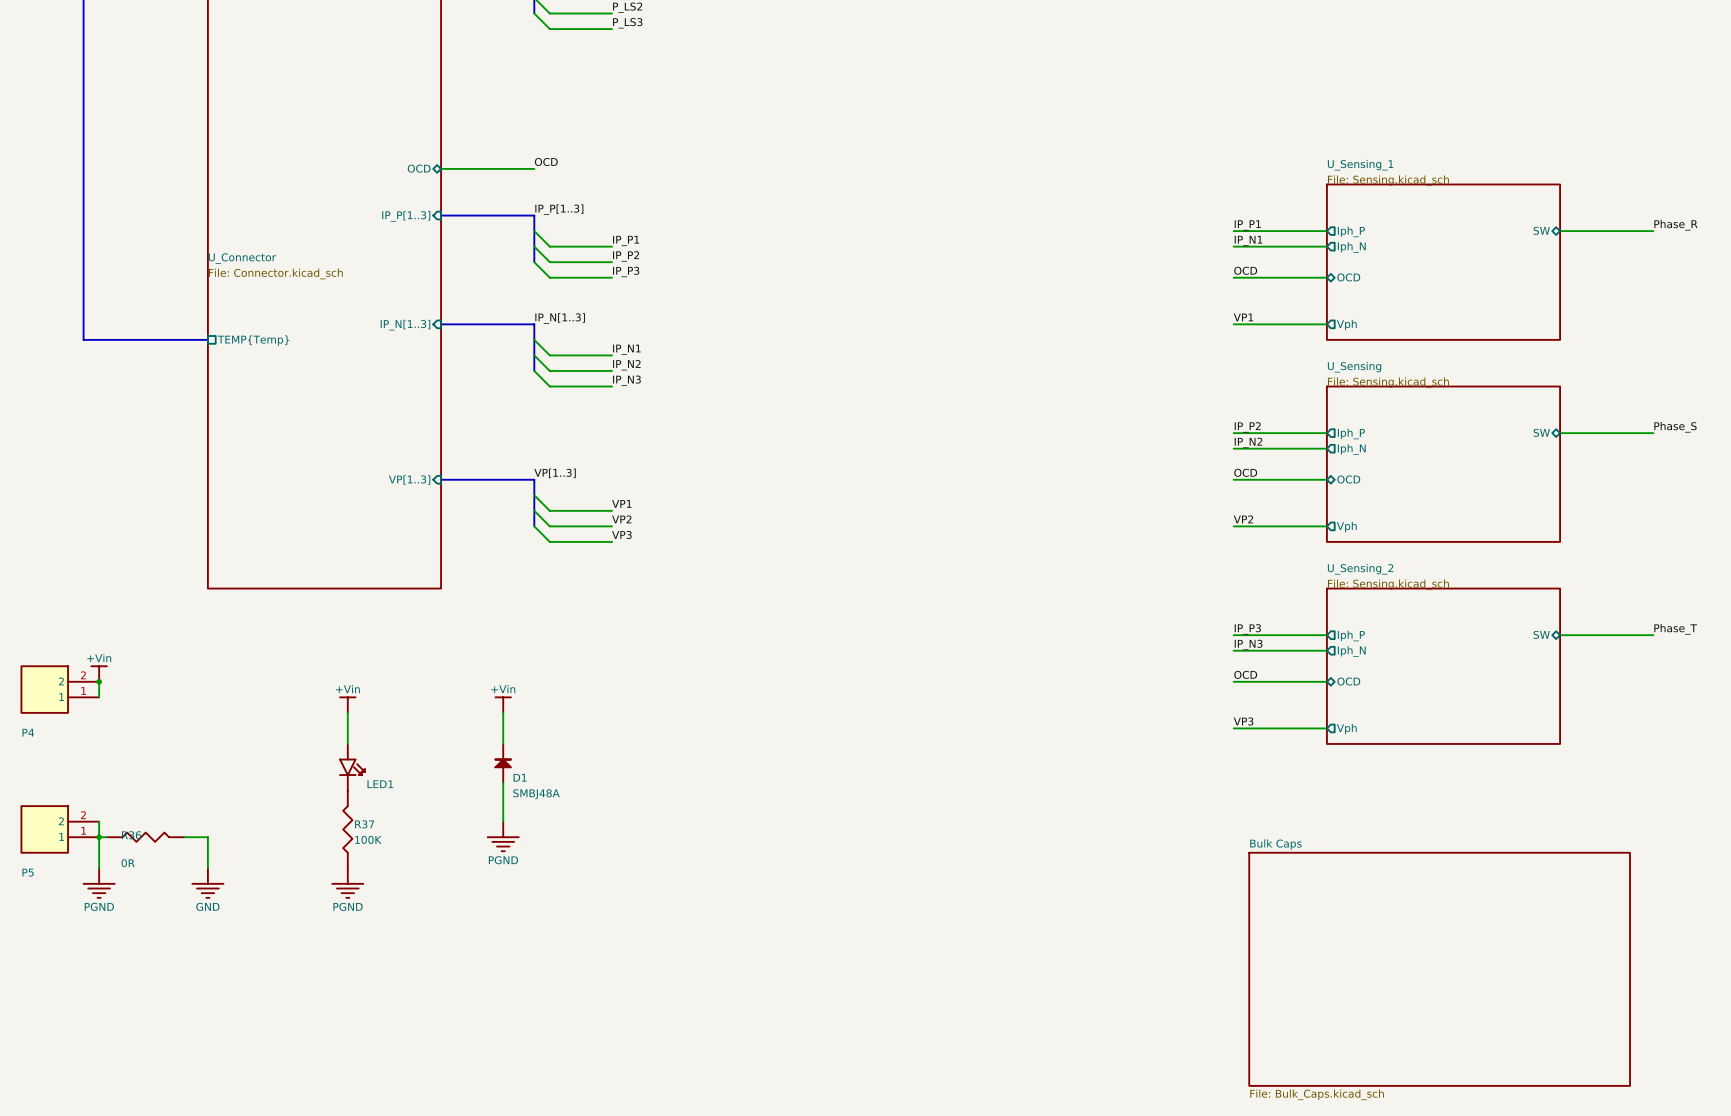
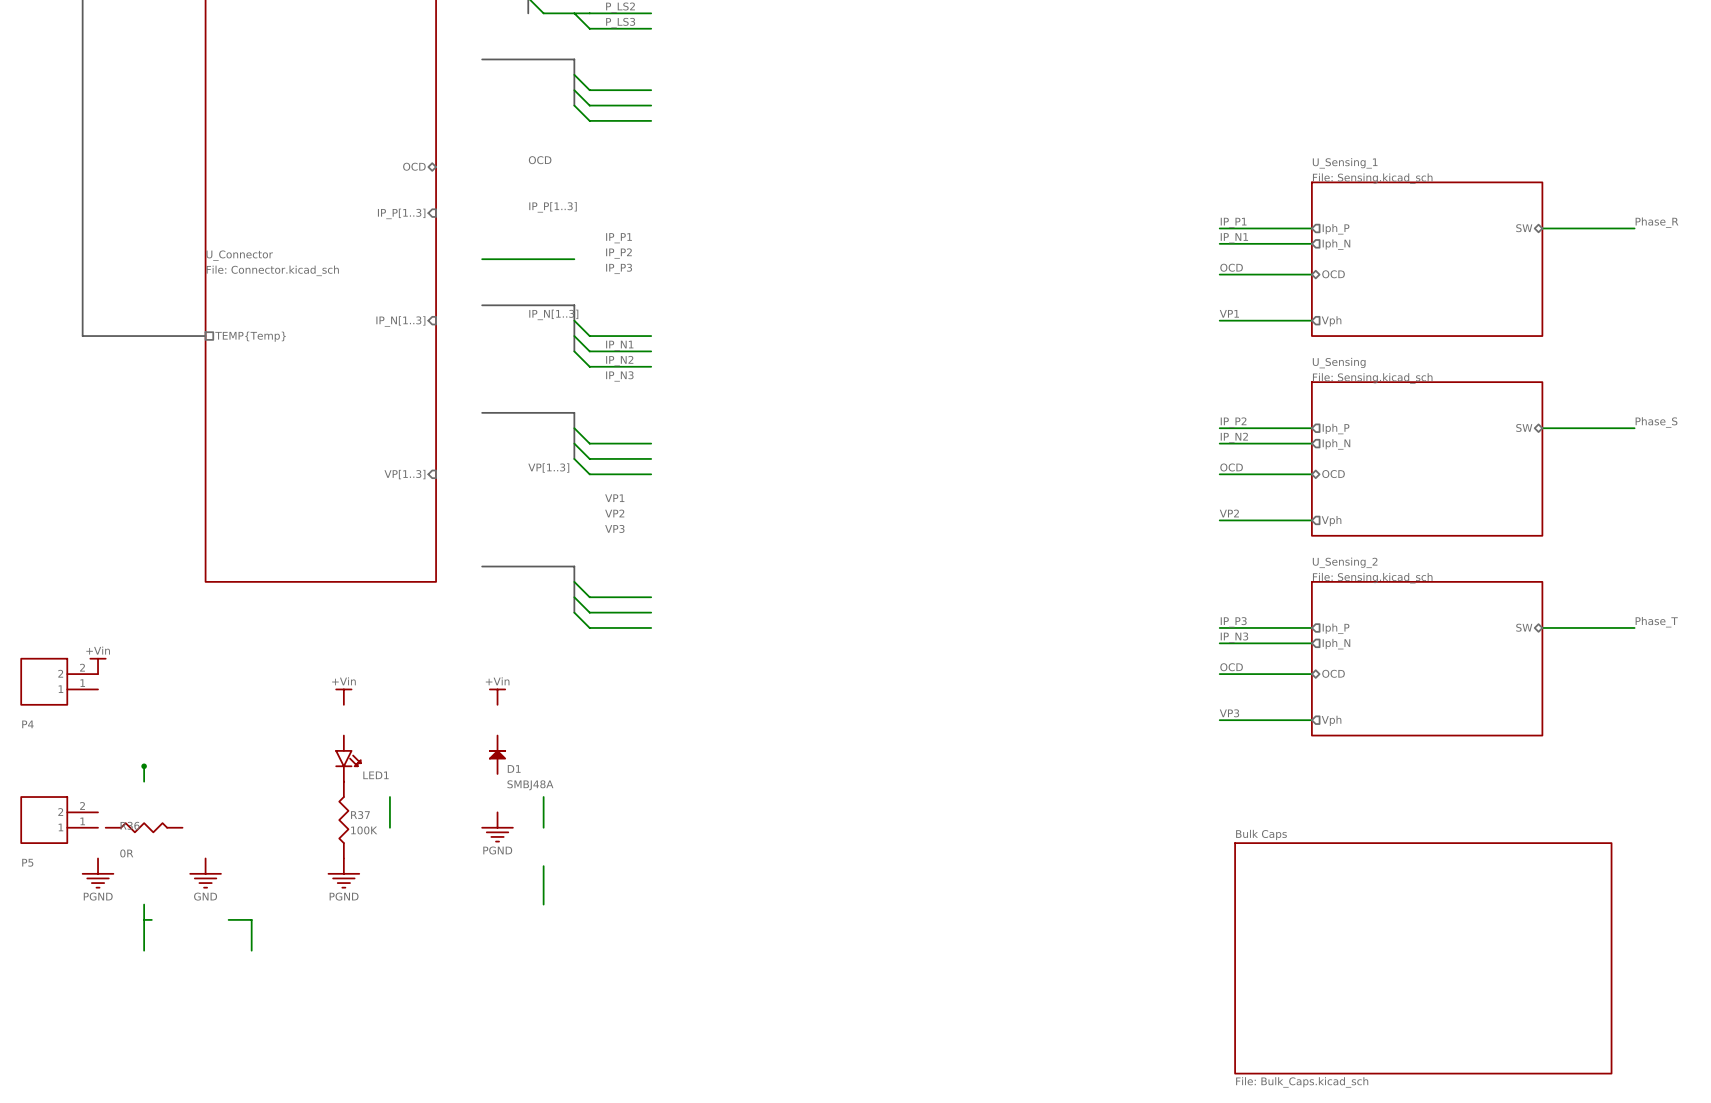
wire: (534, 13) (549, 29) (596, 29) -> (574, 13) (589, 28)
wire: none -> (605, 13) (651, 13)
wire: none -> (605, 28) (651, 28)
bus: none -> (482, 59) (574, 59) (574, 105)
wire: none -> (574, 74) (589, 90) (651, 90)
wire: none -> (574, 90) (589, 105) (651, 105)
wire: none -> (574, 105) (589, 120) (651, 120)
wire: (441, 168) (534, 168) -> none
bus: (441, 215) (534, 215) (534, 262) -> (482, 305) (574, 305) (574, 351)
wire: (534, 231) (549, 246) (612, 246) -> (574, 320) (589, 336) (651, 336)
wire: (534, 246) (549, 262) -> (482, 259) (543, 259)
wire: (534, 262) (549, 277) (612, 277) -> none
wire: (580, 262) (612, 262) -> none
bus: (441, 324) (534, 324) (534, 370) -> (482, 412) (574, 412) (574, 458)
wire: (534, 339) (549, 355) (596, 355) -> (574, 336) (589, 351)
wire: (534, 355) (549, 370) (596, 370) -> (574, 351) (589, 366)
wire: none -> (605, 351) (651, 351)
wire: (534, 370) (549, 386) (612, 386) -> (574, 458) (589, 474) (651, 474)
wire: none -> (605, 366) (651, 366)
wire: none -> (574, 428) (589, 443) (651, 443)
wire: none -> (574, 443) (589, 458) (651, 458)
bus: (441, 479) (534, 479) (534, 526) -> (482, 566) (574, 566) (574, 612)
wire: (534, 495) (549, 510) (612, 510) -> (574, 581) (589, 597) (651, 597)
wire: (534, 510) (549, 526) (612, 526) -> (574, 597) (589, 612) (651, 612)
wire: (534, 526) (549, 541) (612, 541) -> (574, 612) (589, 627) (651, 627)
wire: (99, 681) (99, 697) -> (144, 766) (144, 781)
junction: (99, 681) -> none
wire: (347, 712) (347, 743) -> (389, 797) (389, 827)
wire: (503, 712) (503, 743) -> (543, 797) (543, 827)
junction: none -> (144, 766)
wire: (503, 782) (503, 821) -> (543, 866) (543, 904)
wire: (99, 821) (99, 868) -> (144, 904) (144, 950)
wire: (99, 837) (106, 837) -> (144, 919) (151, 919)
junction: (99, 837) -> none
wire: (184, 837) (207, 837) (207, 868) -> (228, 919) (251, 919) (251, 950)

